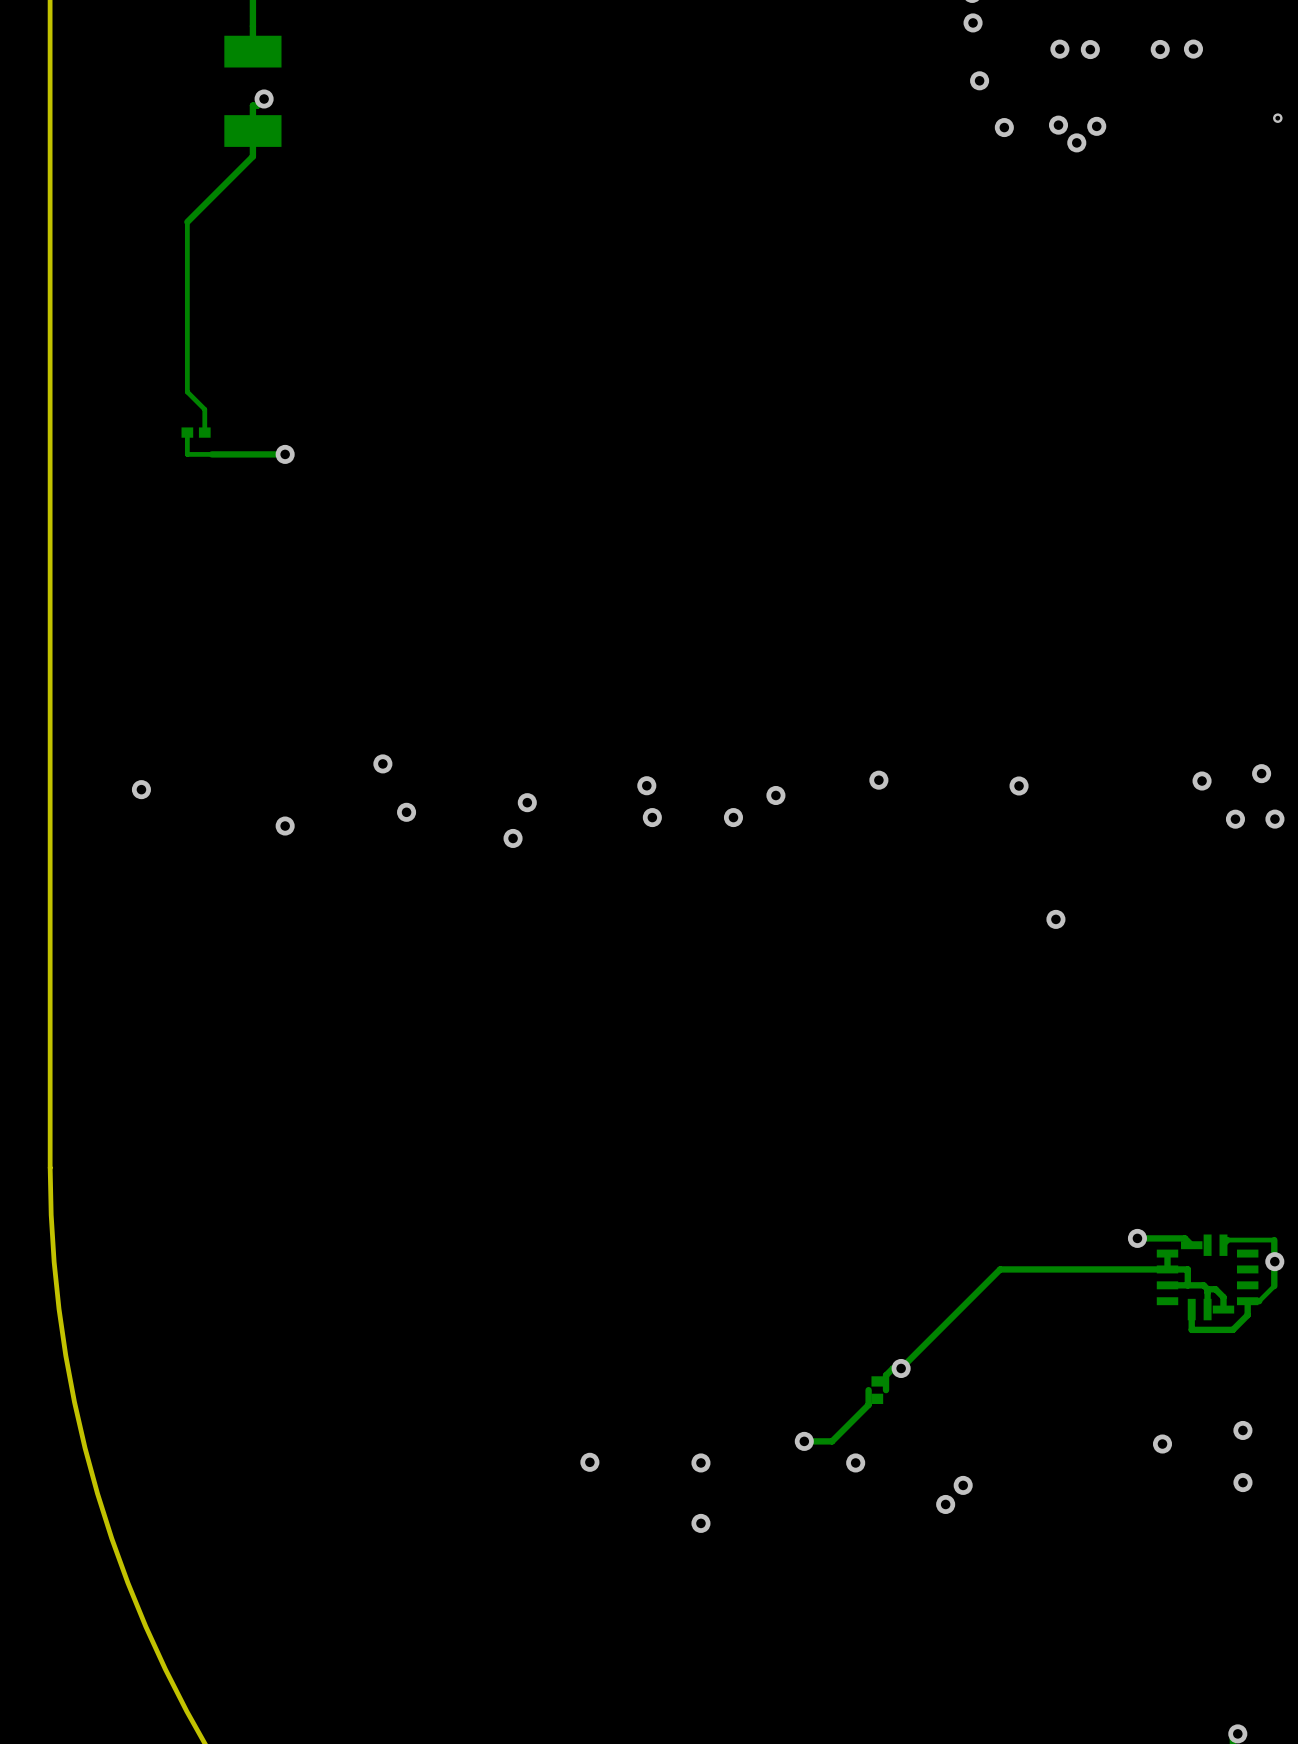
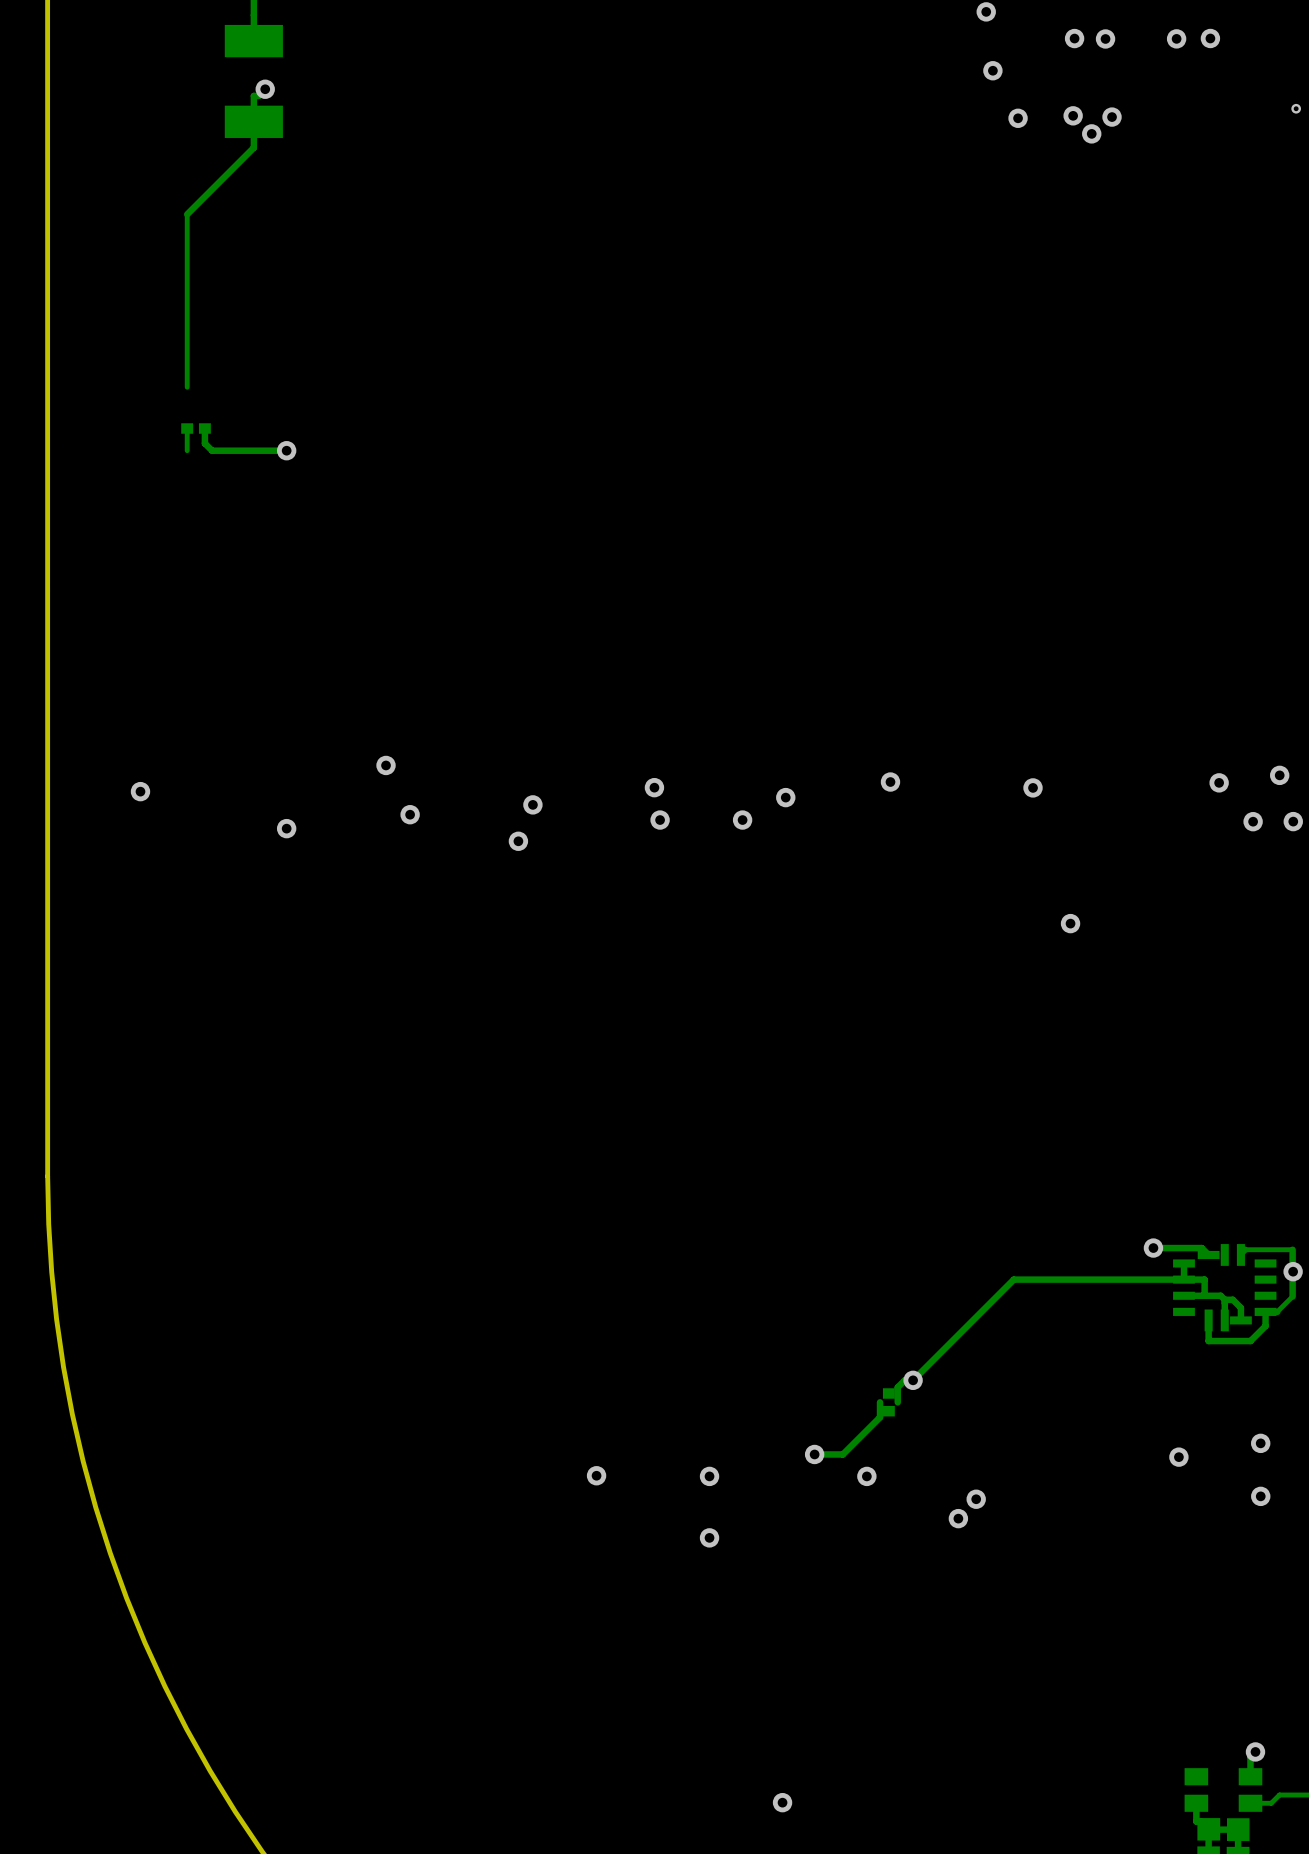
track: (187, 392) (204, 409) (204, 432) -> none
track: (211, 454) (187, 454) -> (212, 450) (204, 443) (204, 428)

